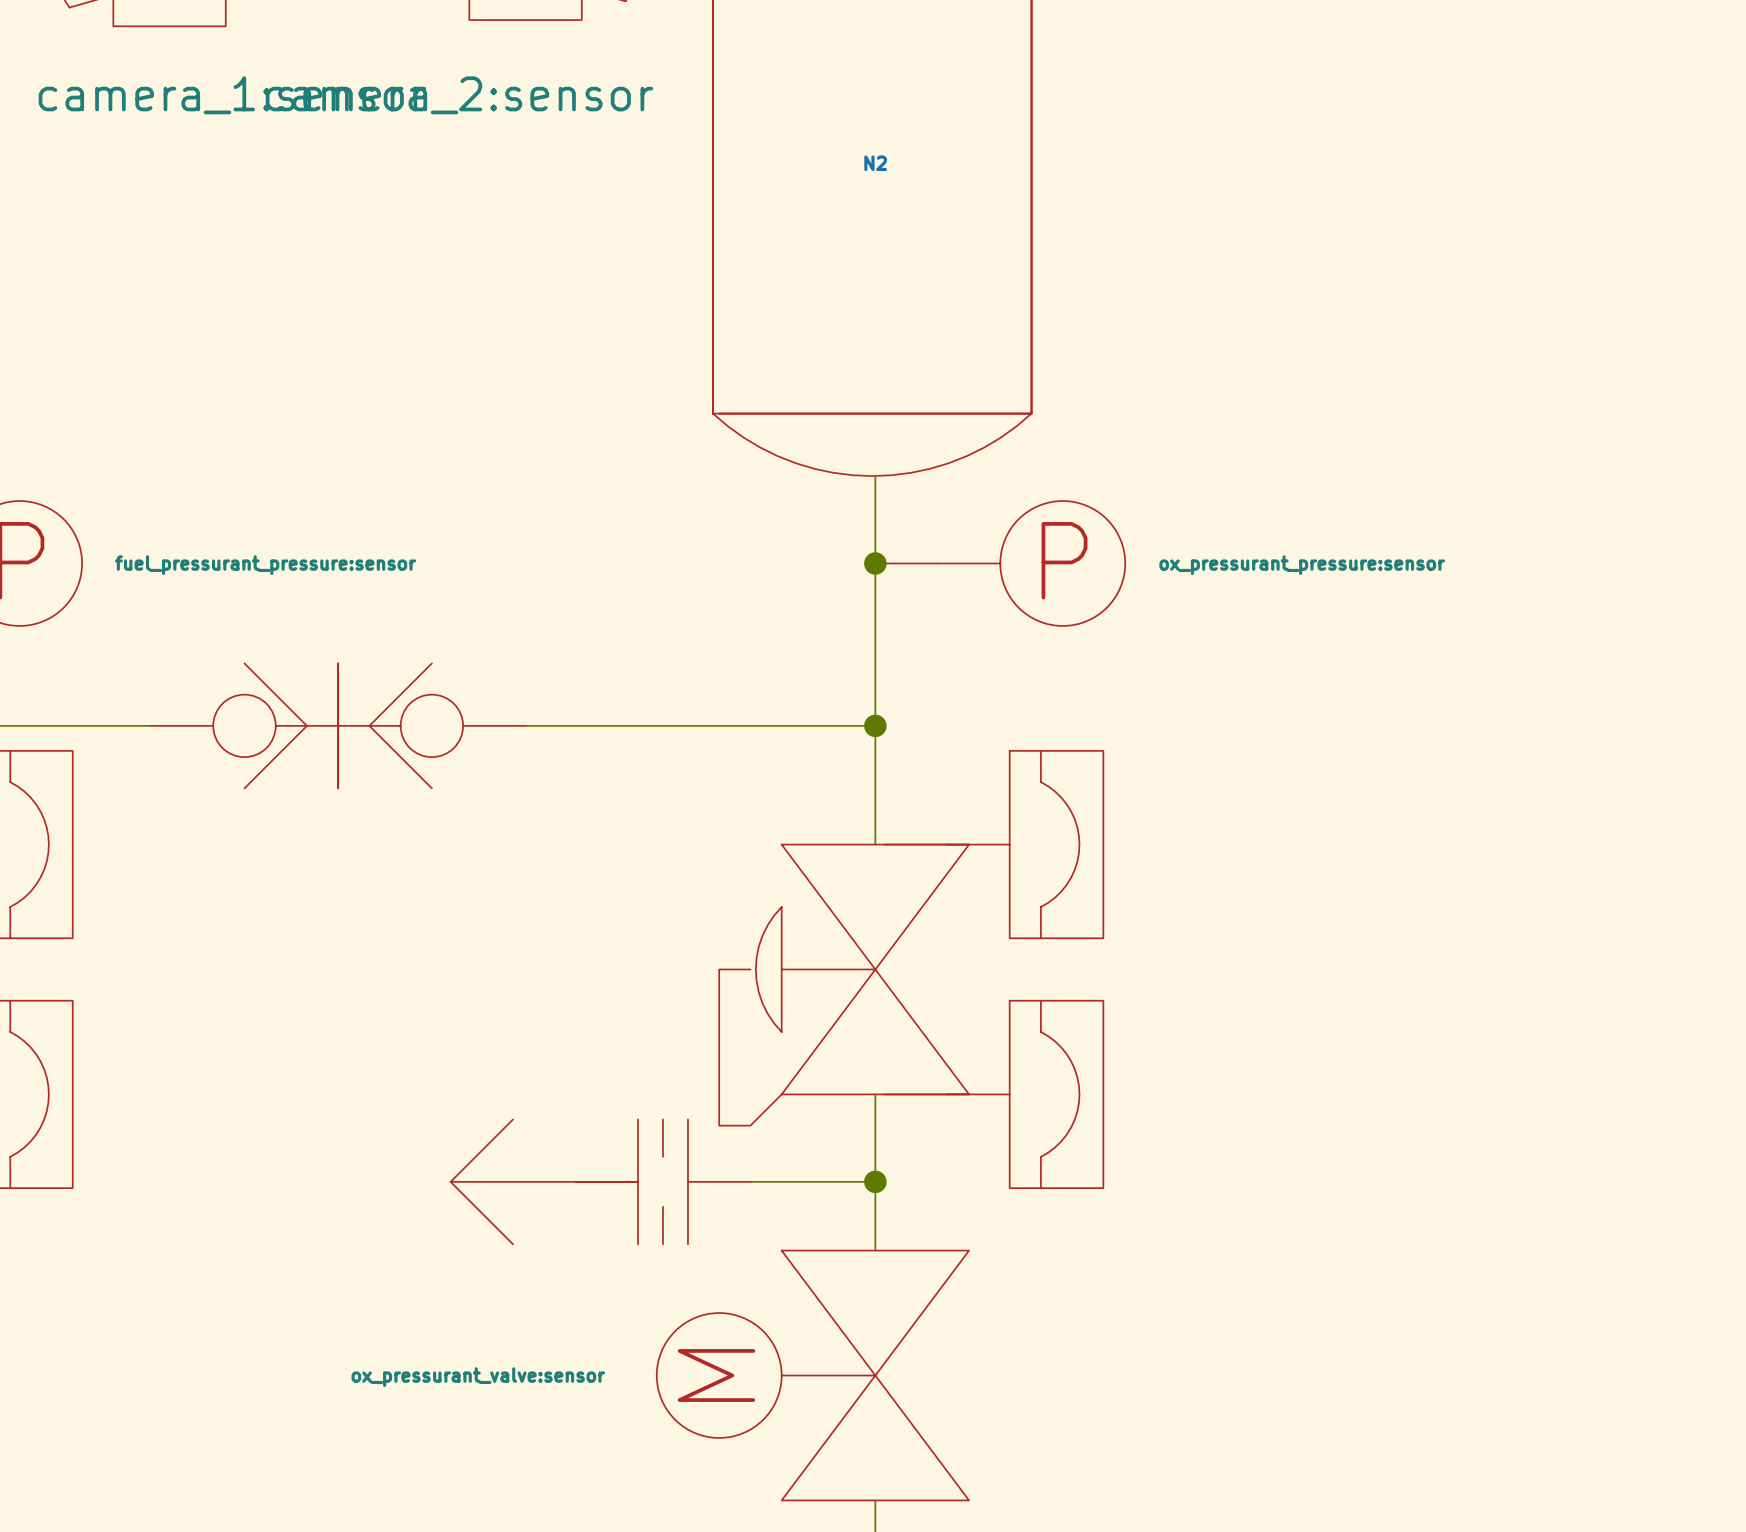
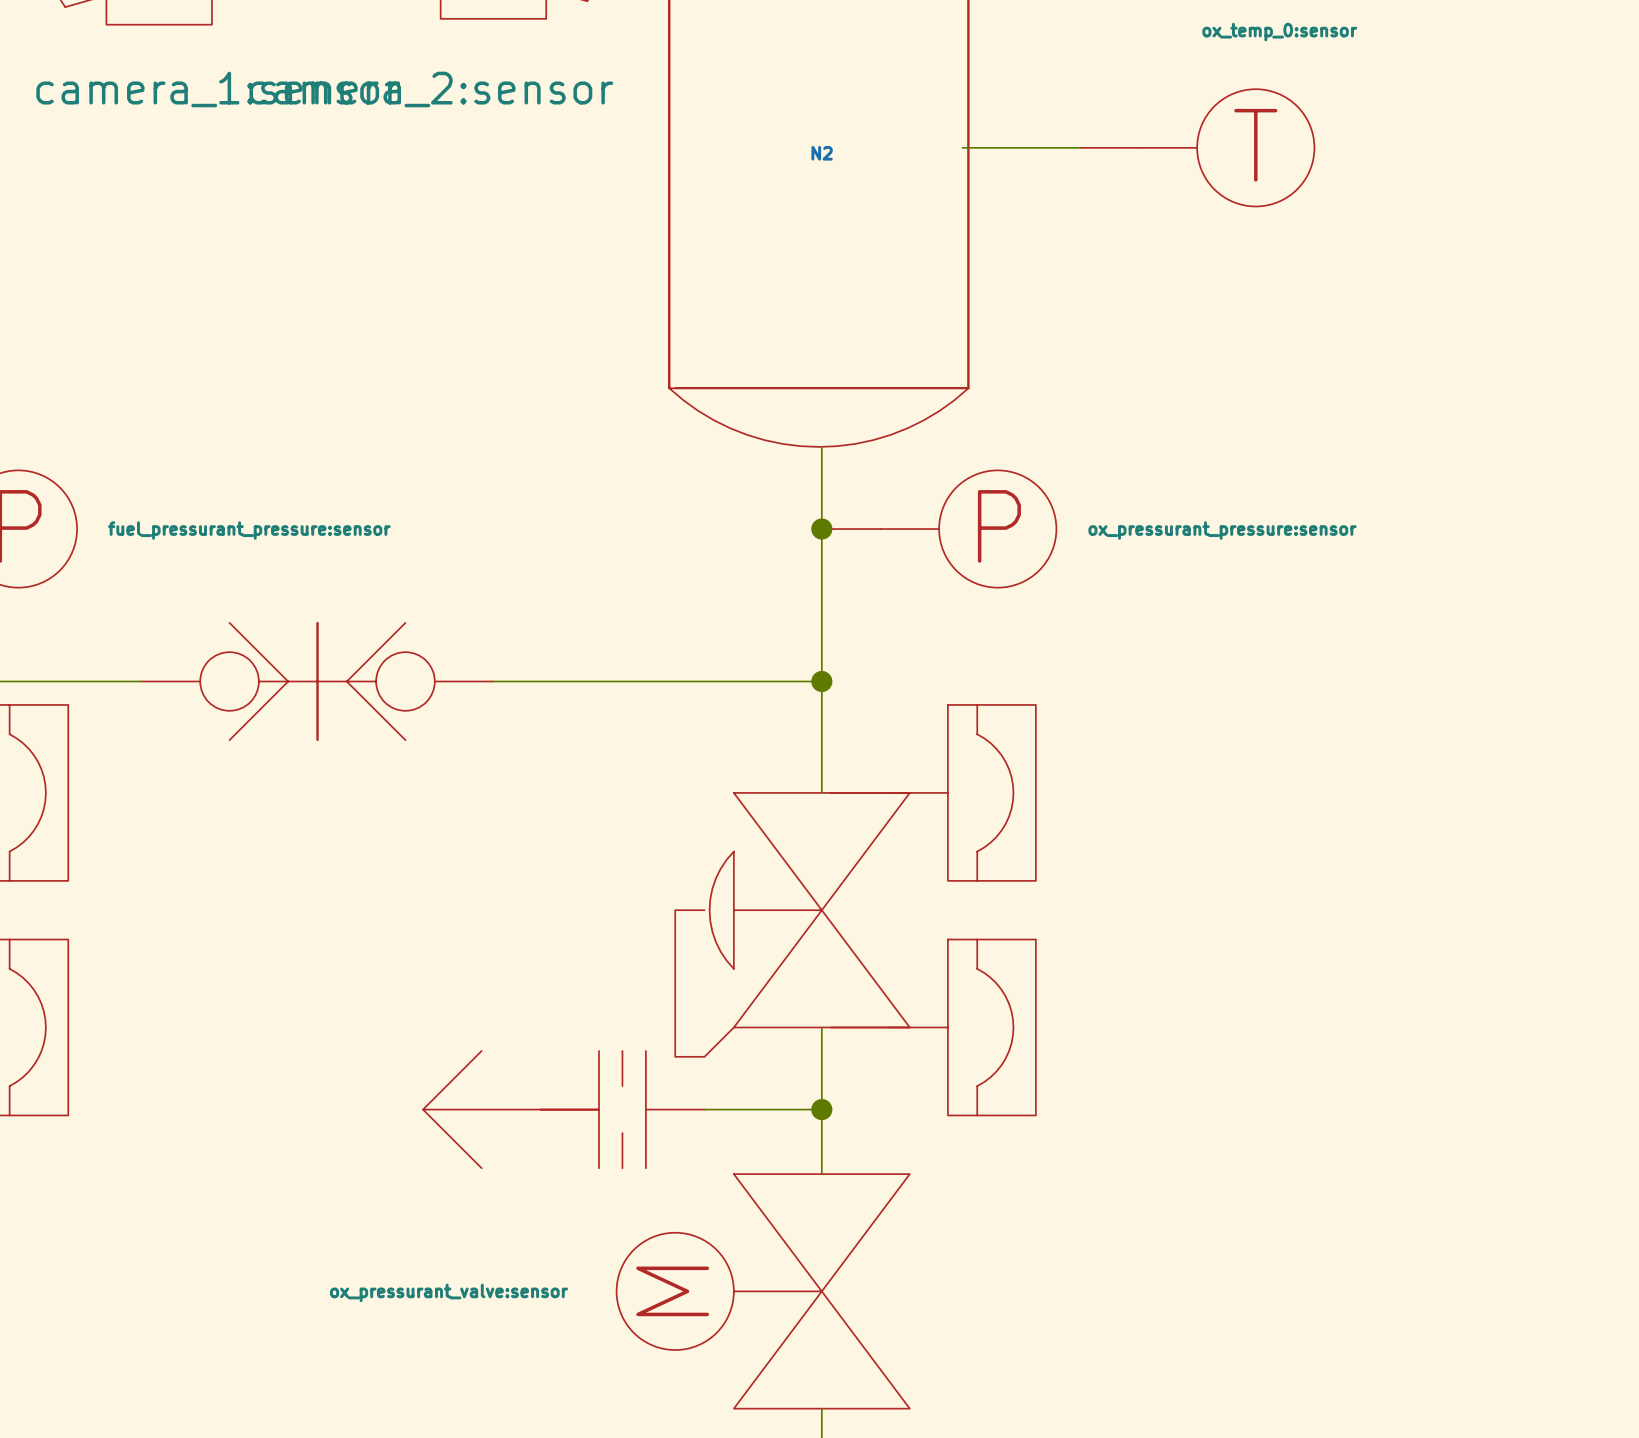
wire: none -> (962, 147) (1079, 147)
part: none -> ox_temp_0:sensor (1197, 147)

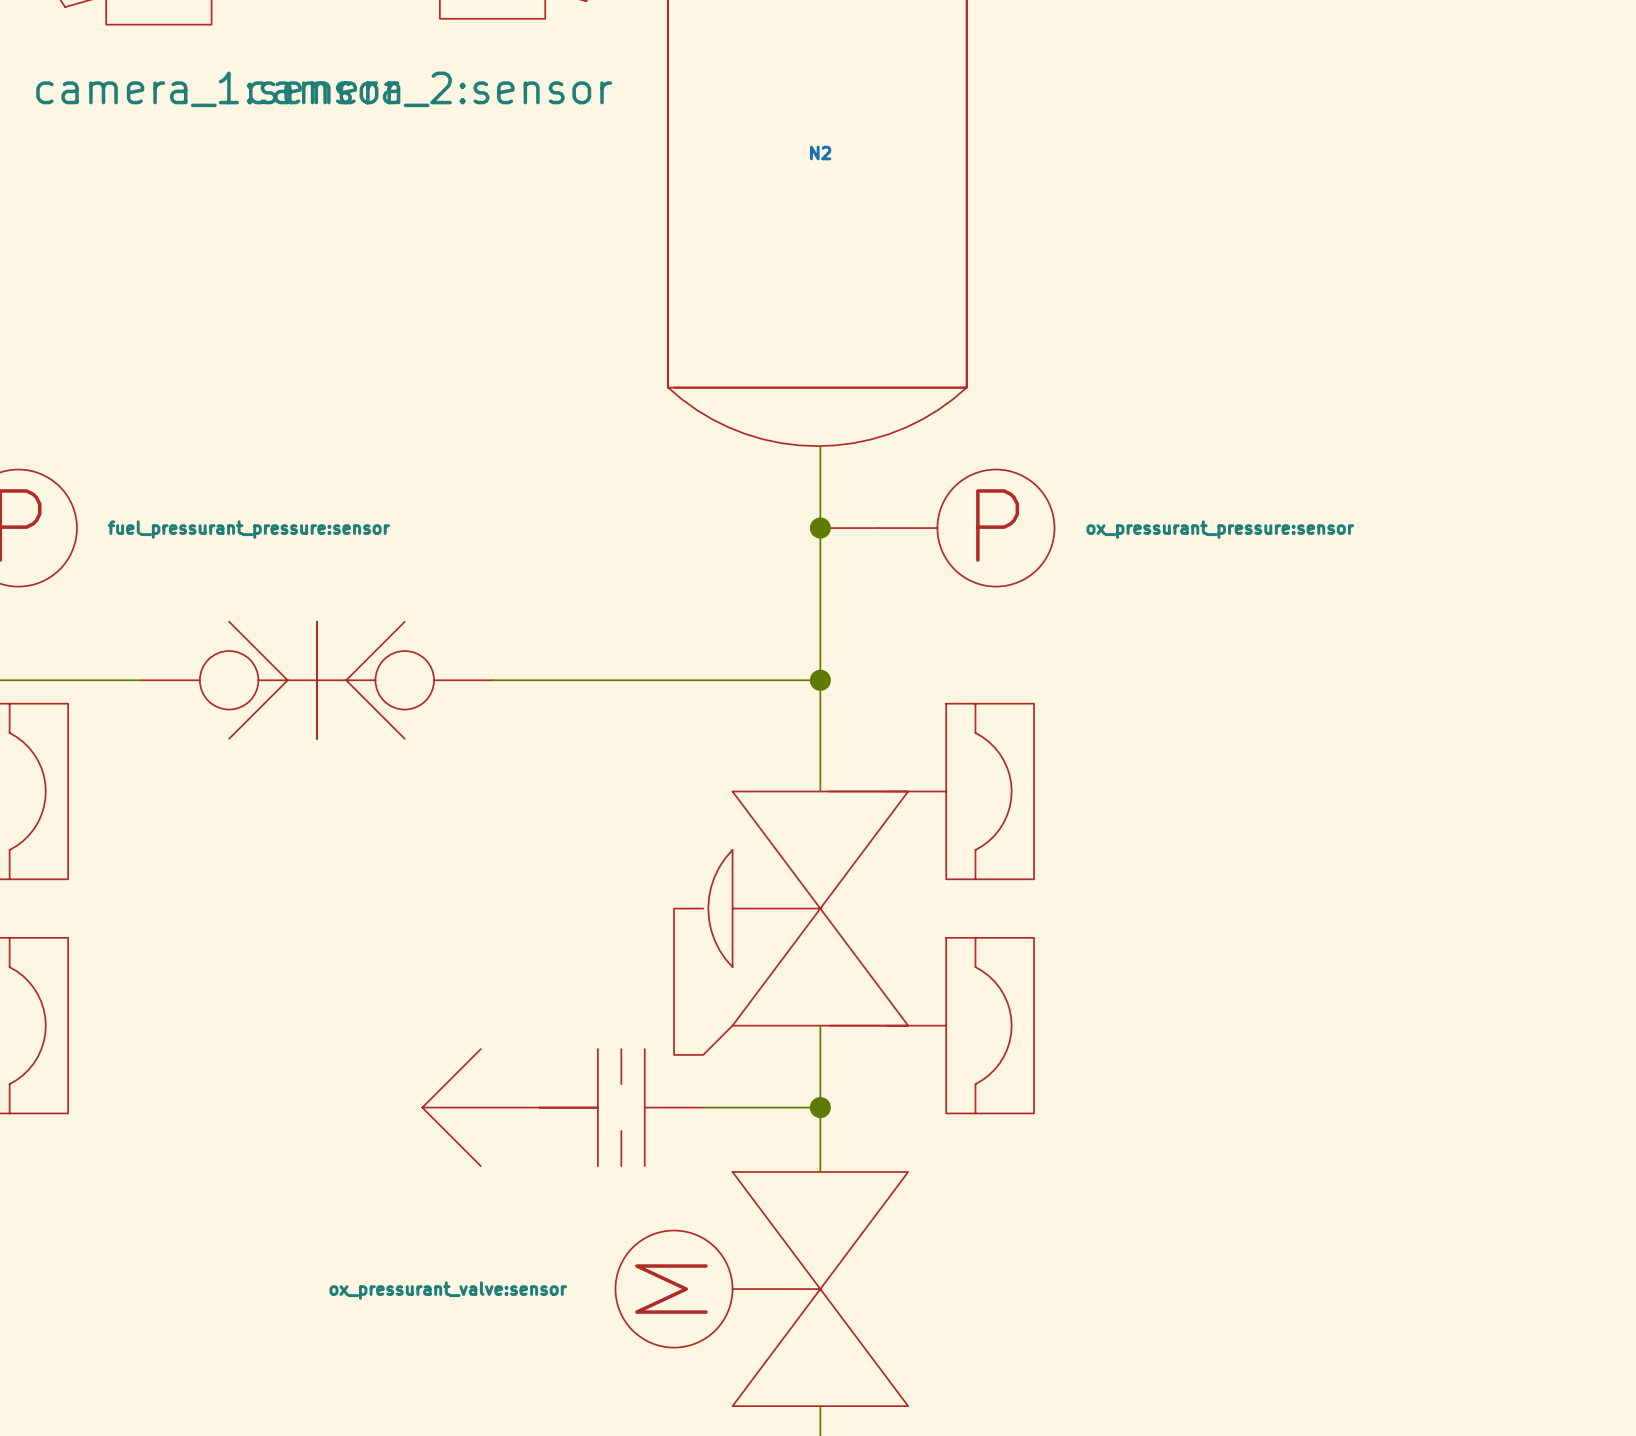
wire: (962, 147) (1079, 147) -> none
part: ox_temp_0:sensor (1197, 147) -> none

